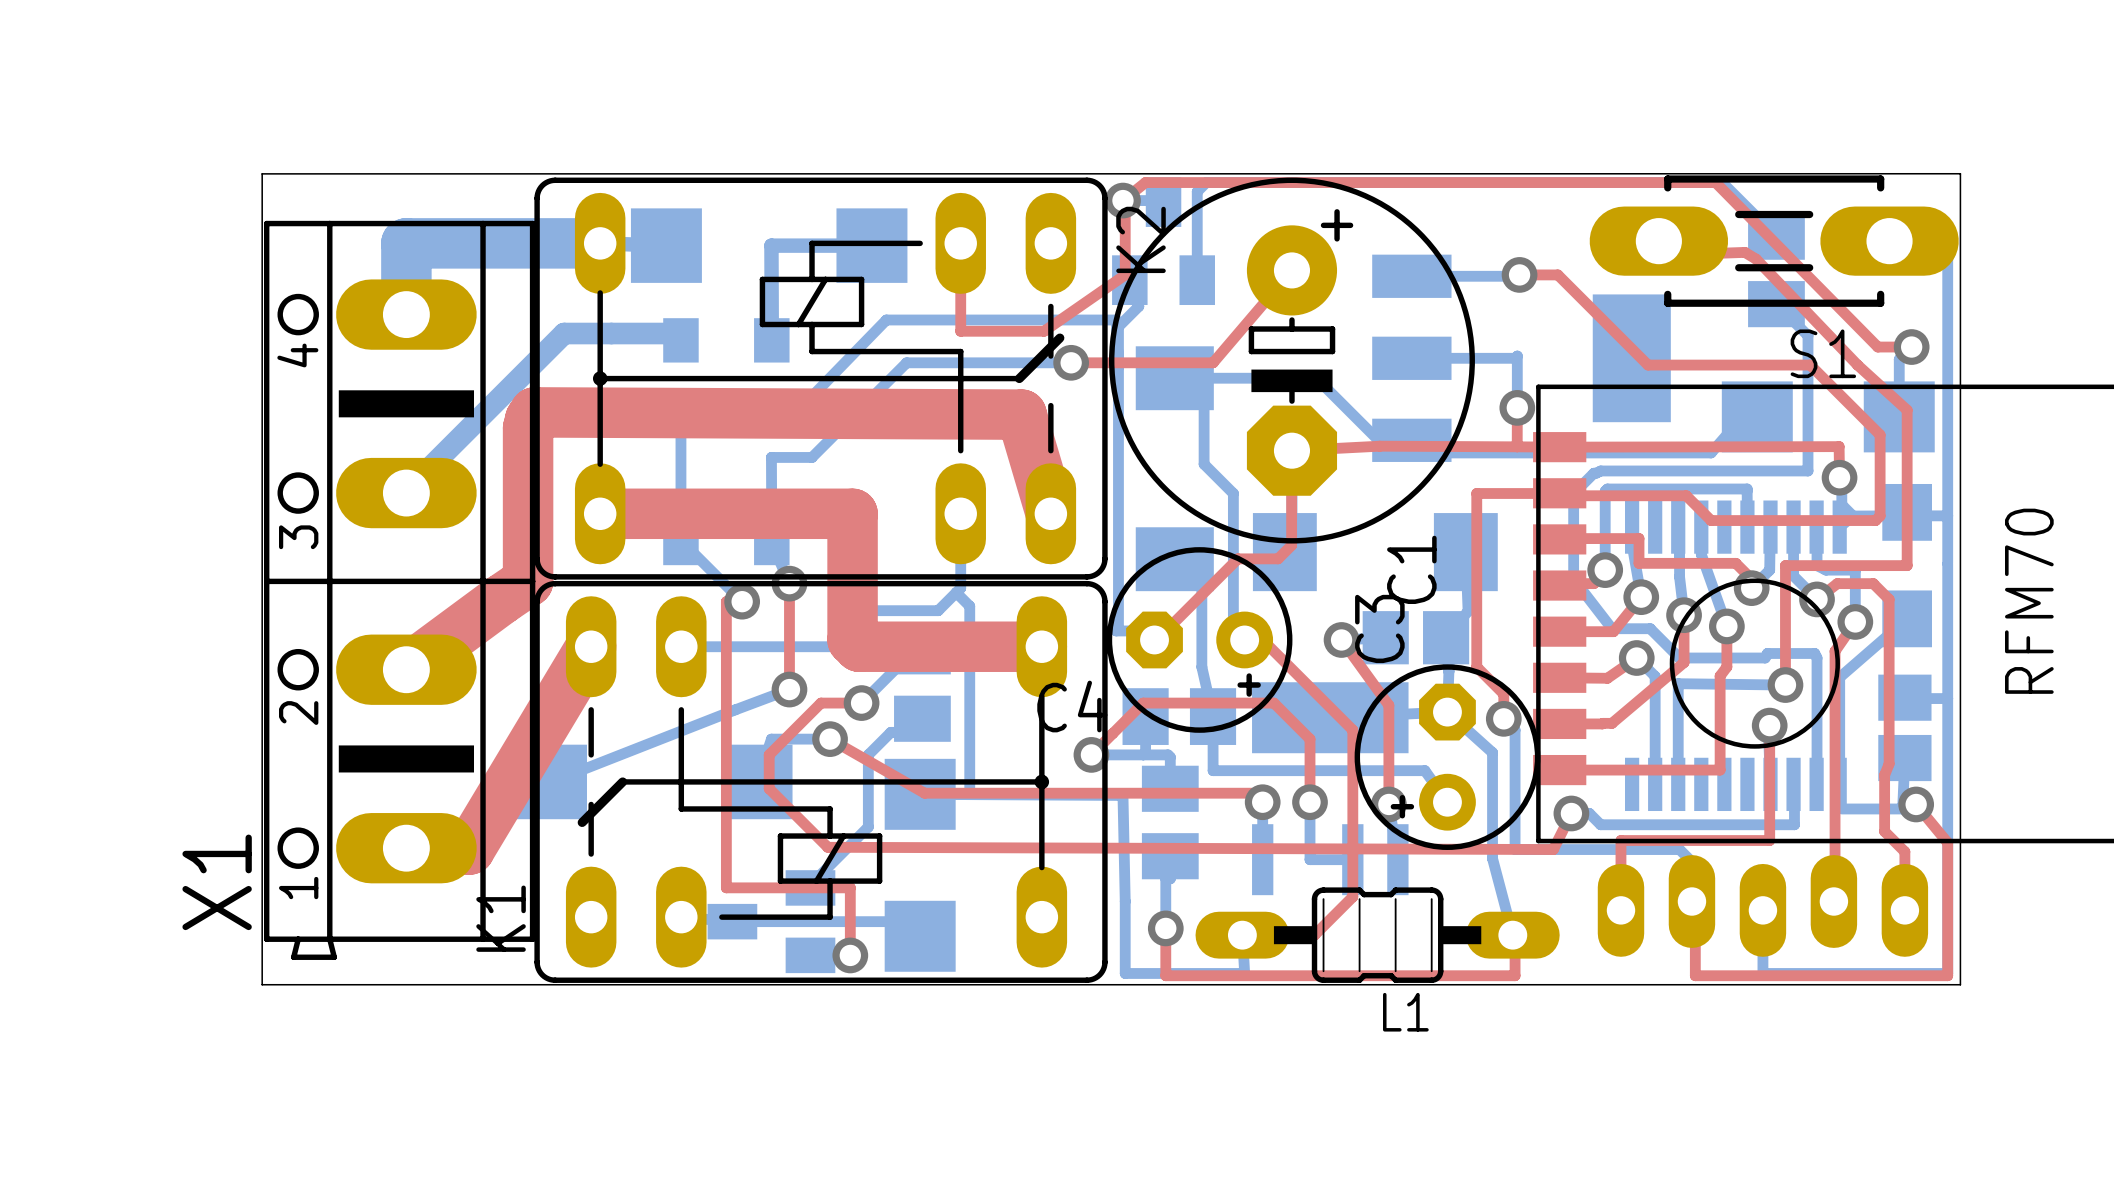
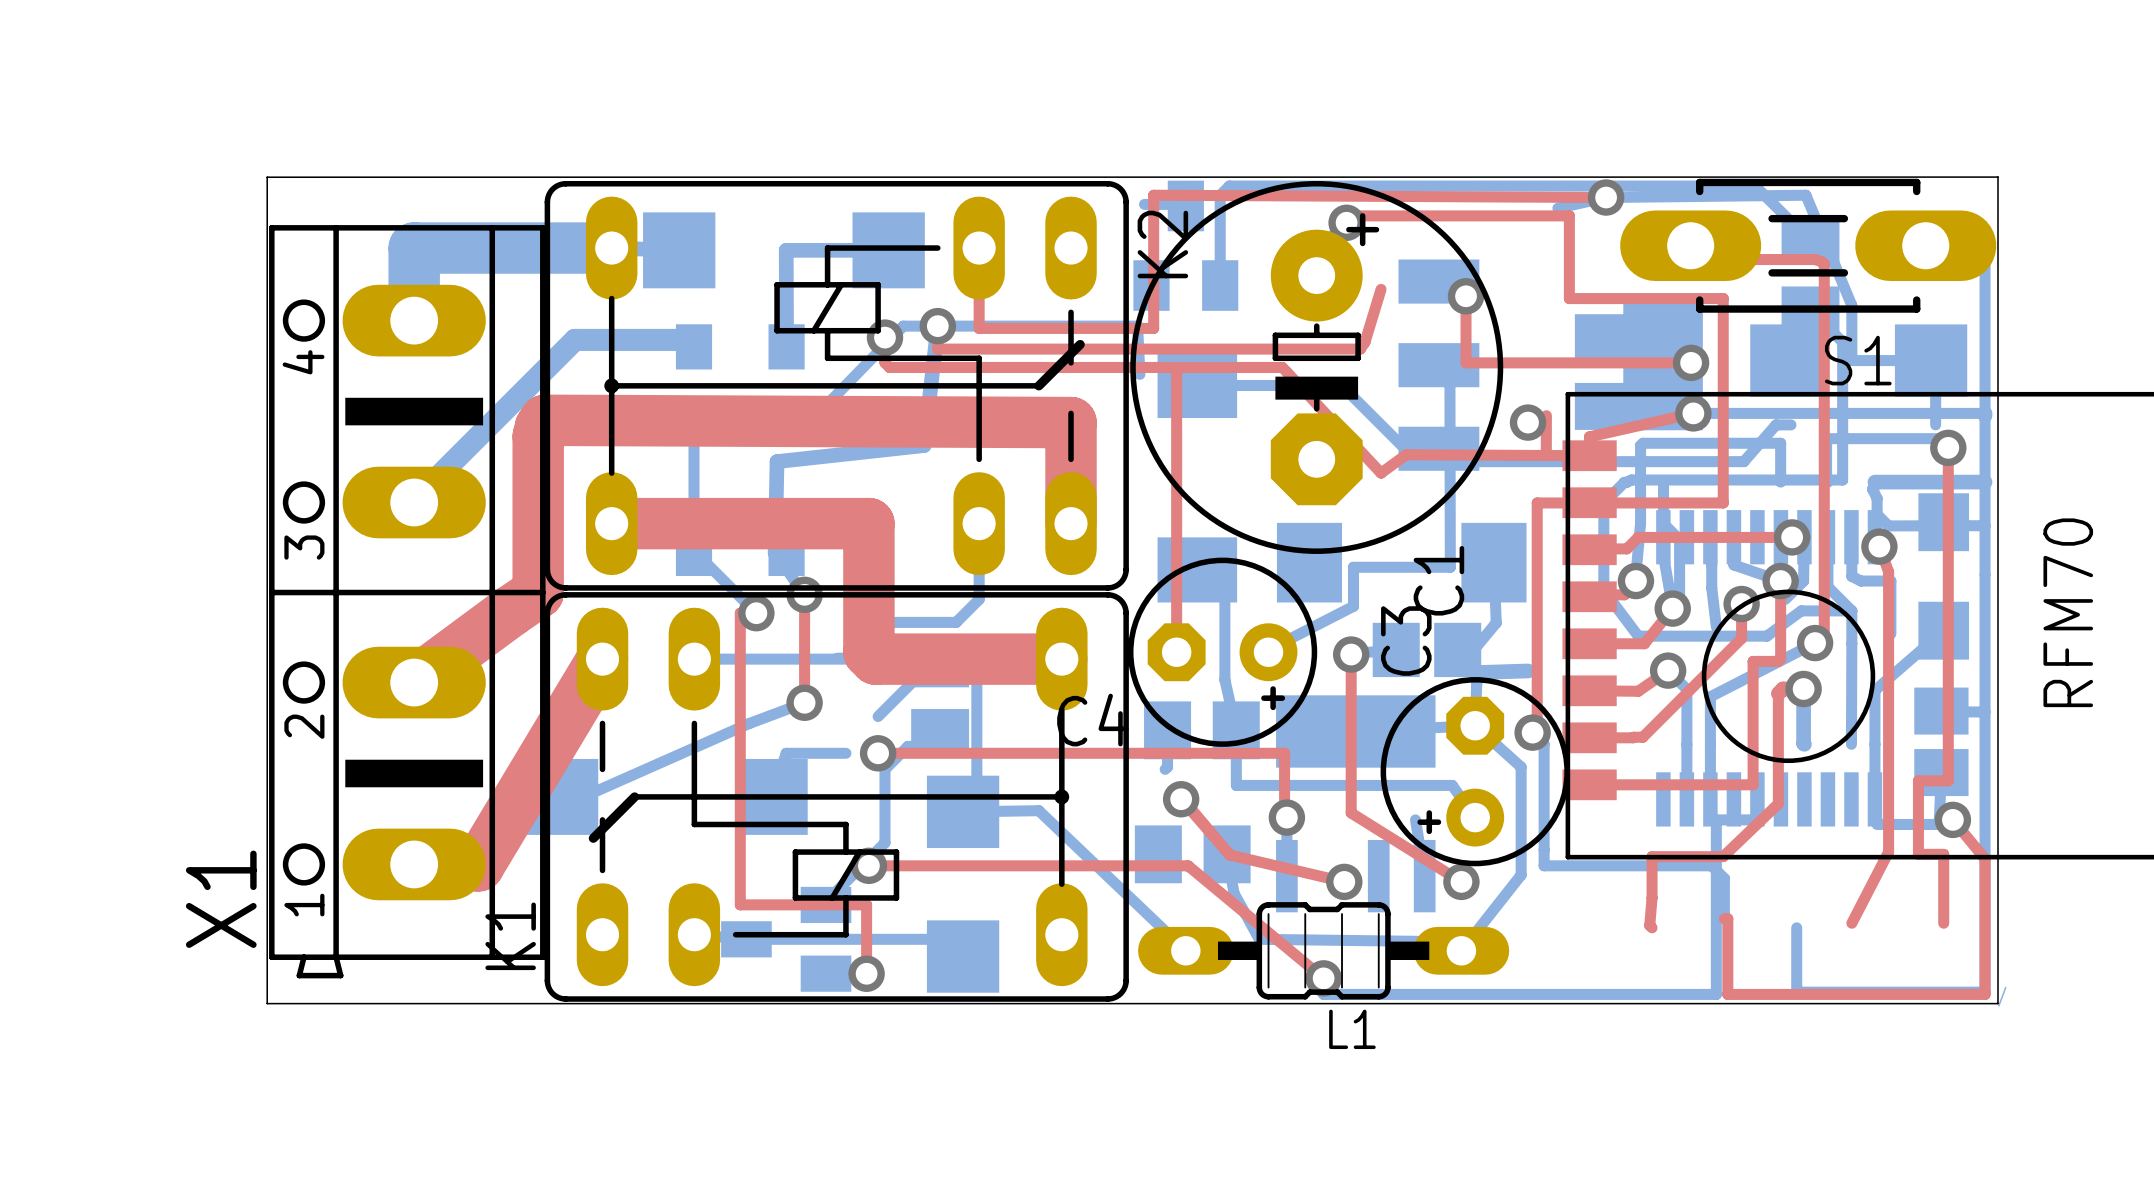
via: none -> (1606, 197)
via: (1122, 200) -> none
bottom track: none -> (1557, 208) (1606, 197) (1805, 195) (1851, 305) (1851, 360) (1931, 360)
via: none -> (1346, 222)
top track: (1679, 254) (1744, 252) (1756, 259) (1857, 365) (1907, 410) (1907, 565) (1785, 565) (1785, 685) -> (1711, 259) (1815, 259) (1824, 264) (1824, 645) (1815, 643)
top track: (1291, 270) (1213, 362) (1071, 362) -> none
bottom track: (1519, 274) (1411, 276) -> none
top track: (1519, 274) (1557, 274) (1648, 365) (1810, 365) (1880, 434) (1880, 516) (1875, 520) (1711, 520) (1686, 495) (1562, 495) (1559, 493) -> (1346, 222) (1351, 215) (1569, 215) (1569, 298) (1723, 298) (1723, 502) (1589, 502)
via: (1519, 274) -> none
bottom track: (1129, 280) (1138, 306) (1118, 326) (1118, 628) (1116, 630) (1145, 630) (1154, 639) -> none
top track: none -> (1381, 289) (1364, 342) (1360, 349) (937, 349) (937, 326)
top track: none -> (1466, 296) (1466, 362) (1691, 362)
via: none -> (1466, 296)
via: none -> (937, 326)
top track: (960, 322) (960, 331) (1044, 331) (1125, 274) (1125, 202) (1122, 200) (1145, 182) (1715, 182) (1877, 347) (1911, 347) -> (979, 328) (1153, 328) (1153, 195) (1606, 197)
top track: none -> (884, 337) (884, 362) (889, 367) (1282, 367) (1381, 473) (1406, 454) (1589, 455) (1589, 436) (1693, 413)
via: none -> (884, 337)
via: (1911, 347) -> none
bottom track: none -> (1452, 355) (1449, 385) (1450, 567) (1353, 567) (1353, 606) (1268, 649)
via: none -> (1691, 362)
bottom track: (1411, 358) (1515, 358) (1517, 356) (1517, 407) -> none
top track: none -> (1176, 367) (1176, 649)
bottom track: (1071, 362) (906, 362) (812, 457) (771, 457) (771, 542) (789, 583) -> (937, 326) (924, 445) (777, 461) (775, 553) (804, 594)
via: (1071, 362) -> none
part: none -> (1603, 372)
bottom track: (1201, 378) (1204, 380) (1204, 464) (1233, 493) (1233, 621) (1244, 633) (1244, 639) -> none
bottom track: none -> (1693, 413) (1985, 413) (1985, 415)
via: none -> (1693, 413)
via position: (1517, 407) -> (1528, 422)
top track: (534, 412) (1021, 414) (1050, 513) -> (545, 420) (1071, 422) (1071, 523)
part position: (1828, 416) -> (1858, 360)
bottom track: none -> (1948, 447) (1948, 438) (1826, 438) (1827, 482)
top track: none -> (1948, 447) (1948, 780) (1918, 780) (1918, 854) (1943, 854) (1943, 923)
via: none -> (1948, 447)
bottom track: none -> (1663, 482) (1663, 523) (1679, 539) (1679, 608)
bottom track: none -> (1874, 482) (1985, 482)
top track: (1839, 477) (1839, 446) (1379, 446) (1291, 450) (1291, 446) (1291, 545) (1278, 558) (1237, 558) (1156, 639) (1154, 639) -> none
via: (1839, 477) -> none
top track: (1508, 493) (1476, 493) (1476, 667) (1503, 694) (1503, 718) -> (1537, 502) (1537, 728)
bottom track: (1747, 527) (1747, 489) (1607, 489) (1605, 491) (1605, 563) -> (1780, 482) (1780, 443) (1642, 443) (1640, 445) (1640, 523) (1635, 574)
via: none -> (1792, 537)
top track: none -> (1879, 546) (1888, 571) (1888, 852) (1851, 923)
via: none -> (1879, 546)
top track: (1596, 538) (1639, 538) (1639, 563) (1735, 563) (1751, 579) (1751, 588) -> (1626, 548) (1638, 537) (1792, 537)
bottom track: (1701, 554) (1726, 626) -> (1733, 564) (1780, 581)
bottom track: (1573, 579) (1611, 628) (1650, 628) (1679, 658) (1765, 658) (1767, 653) (1814, 653) (1817, 658) (1817, 783) -> (1603, 590) (1638, 636) (1766, 636) (1801, 610) (1851, 610) (1851, 744)
via position: (1751, 588) -> (1780, 581)
bottom track: (956, 592) (969, 606) (969, 794) (920, 794) (1122, 795) (1125, 973) (1244, 973) (1242, 932) (1242, 935) -> none
via: none -> (1741, 604)
top track: (1817, 599) (1837, 583) (1873, 583) (1889, 599) (1889, 763) (1884, 775) (1884, 831) (1904, 851) (1904, 910) -> none
via: (1817, 599) -> none
top track: (1684, 615) (1684, 662) (1611, 723) -> (1741, 604) (1741, 638) (1642, 737)
via: (1684, 615) -> none
top track: (1855, 621) (1835, 651) (1833, 901) -> none
via: (1855, 621) -> none
top track: (1726, 626) (1726, 667) (1720, 676) -> (1780, 581) (1780, 659) (1778, 661) (1753, 661) (1753, 688)
via: (1726, 626) -> none
via: none -> (1815, 643)
part position: (1415, 637) -> (1426, 649)
top track: (1244, 639) (1262, 639) (1352, 730) (1352, 896) (1314, 935) (1242, 935) -> none
top track: (1341, 639) (1388, 705) (1388, 804) -> none
via position: (1341, 639) -> (1351, 654)
top track: none -> (1351, 654) (1351, 813) (1461, 881)
bottom track: none -> (837, 658) (976, 656) (976, 783) (963, 811) (1038, 810) (1185, 950)
bottom track: none -> (1528, 670) (1477, 672)
bottom track: none -> (1803, 688) (1804, 744)
bottom track: (1678, 683) (1785, 685) -> (1710, 696) (1815, 643)
via position: (1785, 685) -> (1803, 688)
top track: (861, 703) (821, 703) (769, 754) (769, 788) (827, 847) (1553, 849) (1571, 813) -> none
via: (861, 703) -> none
bottom track: (735, 709) (551, 781) -> (749, 723) (578, 799)
top track: (1769, 725) (1769, 840) (1690, 840) -> (1803, 688) (1782, 688) (1778, 693) (1778, 803) (1723, 856)
via: (1769, 725) -> none
top track: (830, 739) (924, 793) (1255, 793) (1262, 802) -> none
via position: (830, 739) -> (878, 753)
top track: none -> (878, 753) (1284, 753) (1284, 824)
bottom track: (1091, 754) (1168, 754) (1170, 757) (1170, 788) -> none
top track: (1091, 754) (1143, 703) (1273, 703) (1310, 739) (1310, 802) -> none
via: (1091, 754) -> none
via: none -> (1181, 799)
bottom track: (1793, 784) (1794, 778) (1794, 824) (1600, 824) (1589, 813) (1571, 813) -> none
bottom track: (1310, 802) (1310, 859) (1352, 859) -> none
via: (1310, 802) -> none
via: (1388, 804) -> none
bottom track: none -> (1760, 819) (1716, 819) (1716, 994) (1323, 994) (1323, 978)
via: (1571, 813) -> none
part rotation: 0° (1170, 822) -> 90° clockwise (1192, 854)
top track: none -> (1229, 854) (1344, 881)
top track: none -> (1229, 854) (1181, 799) (1183, 799) (1229, 854)
top track: none -> (868, 865) (1188, 865) (1323, 978)
via: none -> (868, 865)
bottom track: (1170, 856) (1170, 878) (1165, 878) (1165, 928) -> none
bottom track: (1492, 858) (1512, 935) -> (1521, 875) (1461, 950) (1438, 941) (1259, 939) (1234, 893) (1227, 854)
part position: (920, 865) -> (963, 884)
via: none -> (1344, 881)
via: none -> (1461, 881)
part: (1762, 905) -> none
top track: (1165, 928) (1165, 975) (1515, 975) (1515, 935) (1512, 935) -> none
via: (1165, 928) -> none
L1 position: (1377, 935) -> (1323, 950)
via: none -> (1323, 978)
bottom track: none -> (2005, 987) (1998, 1005)

